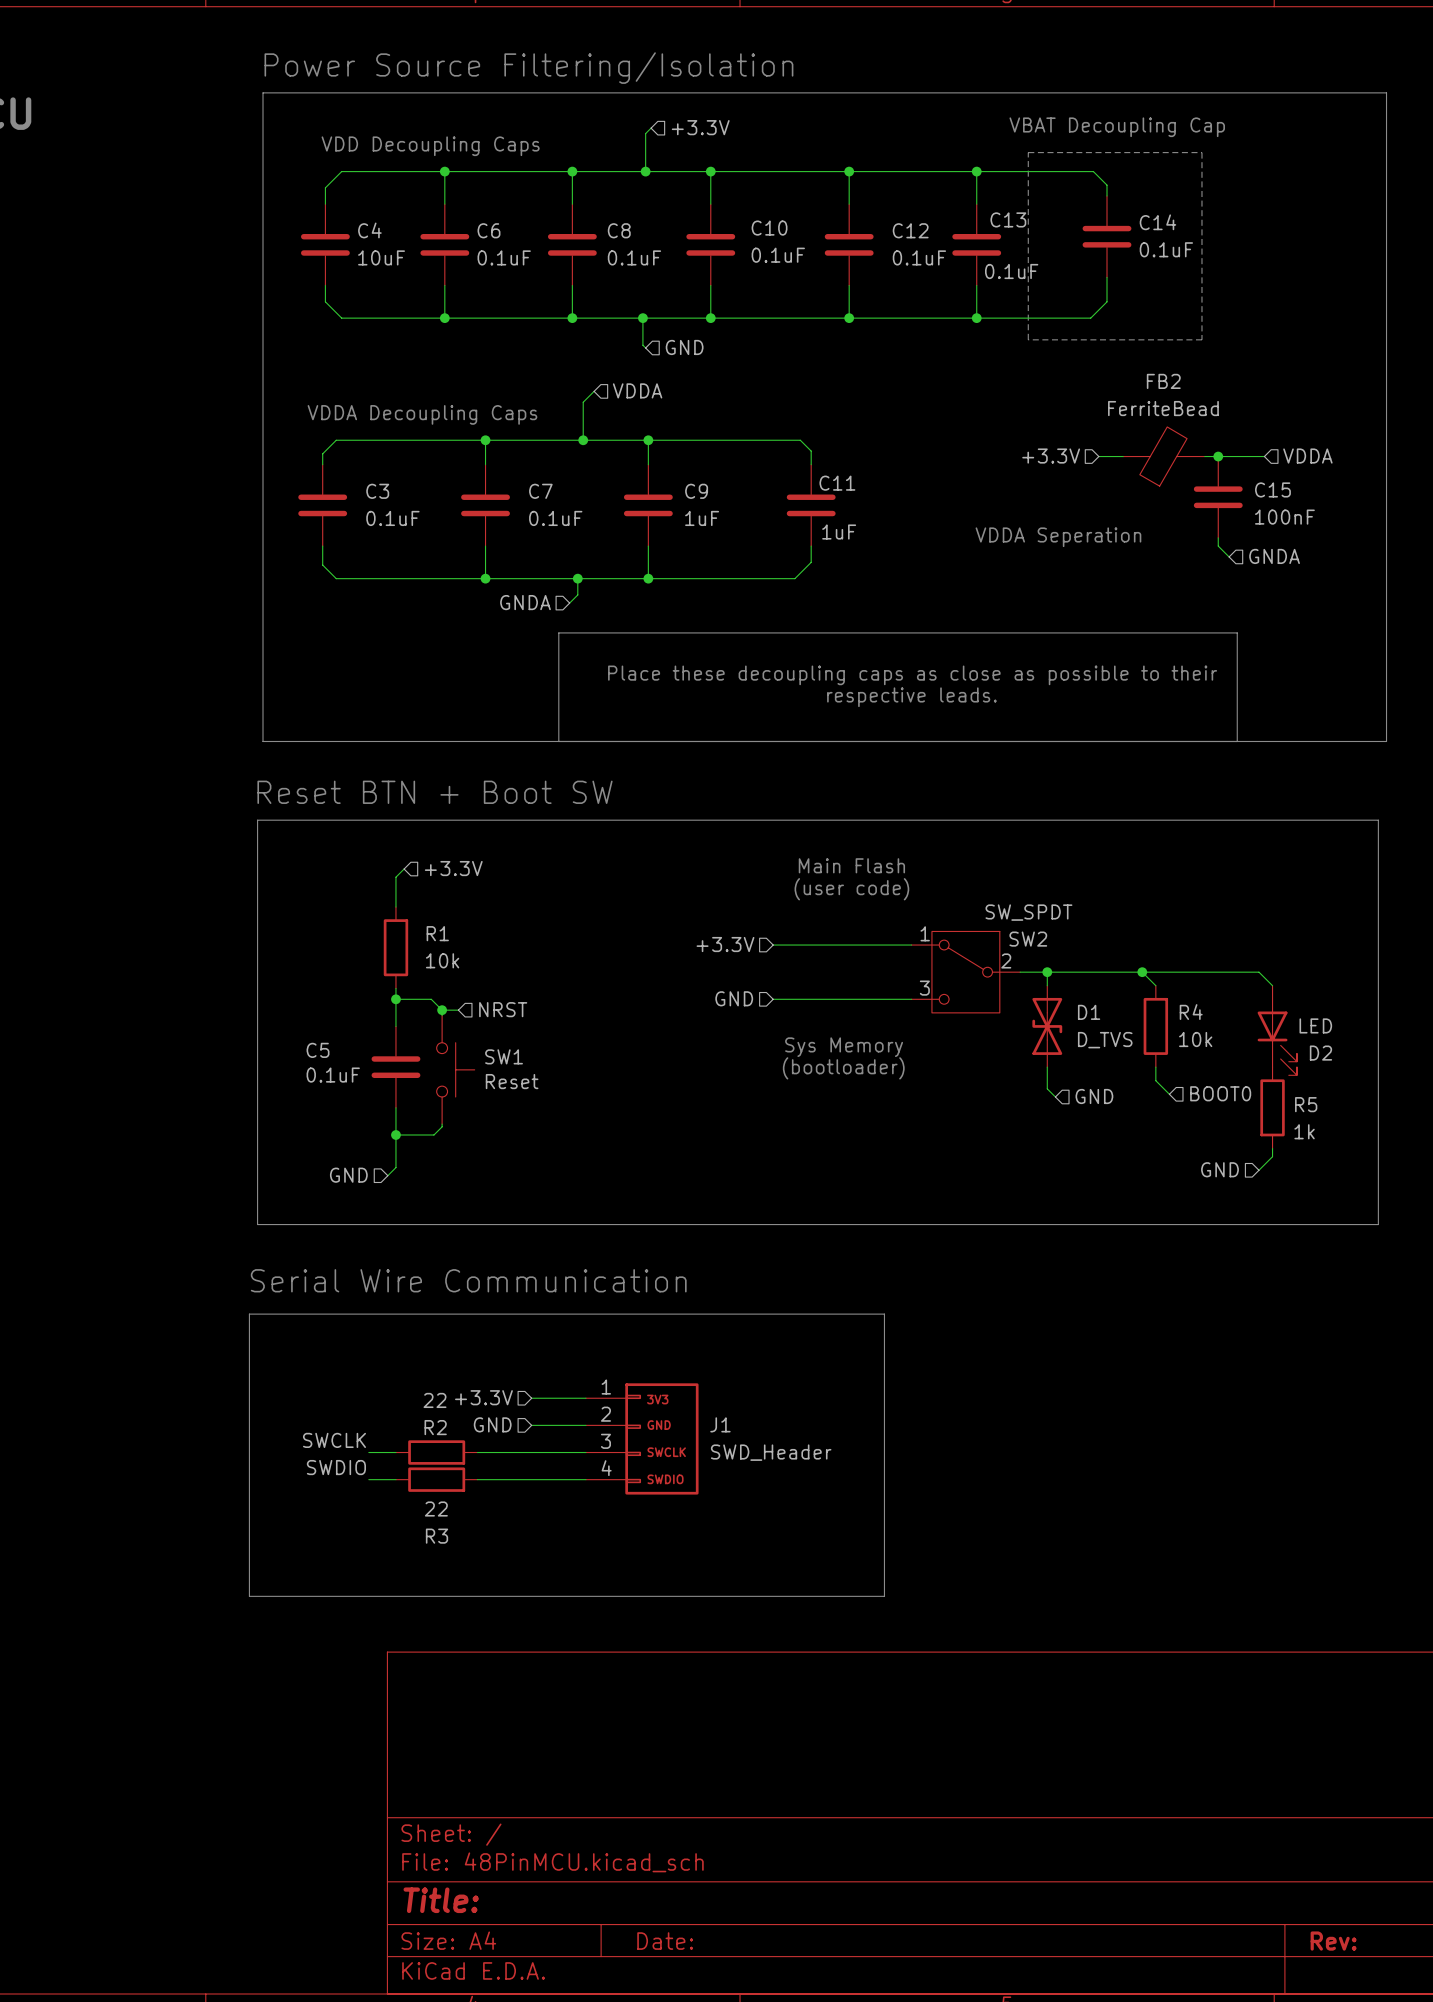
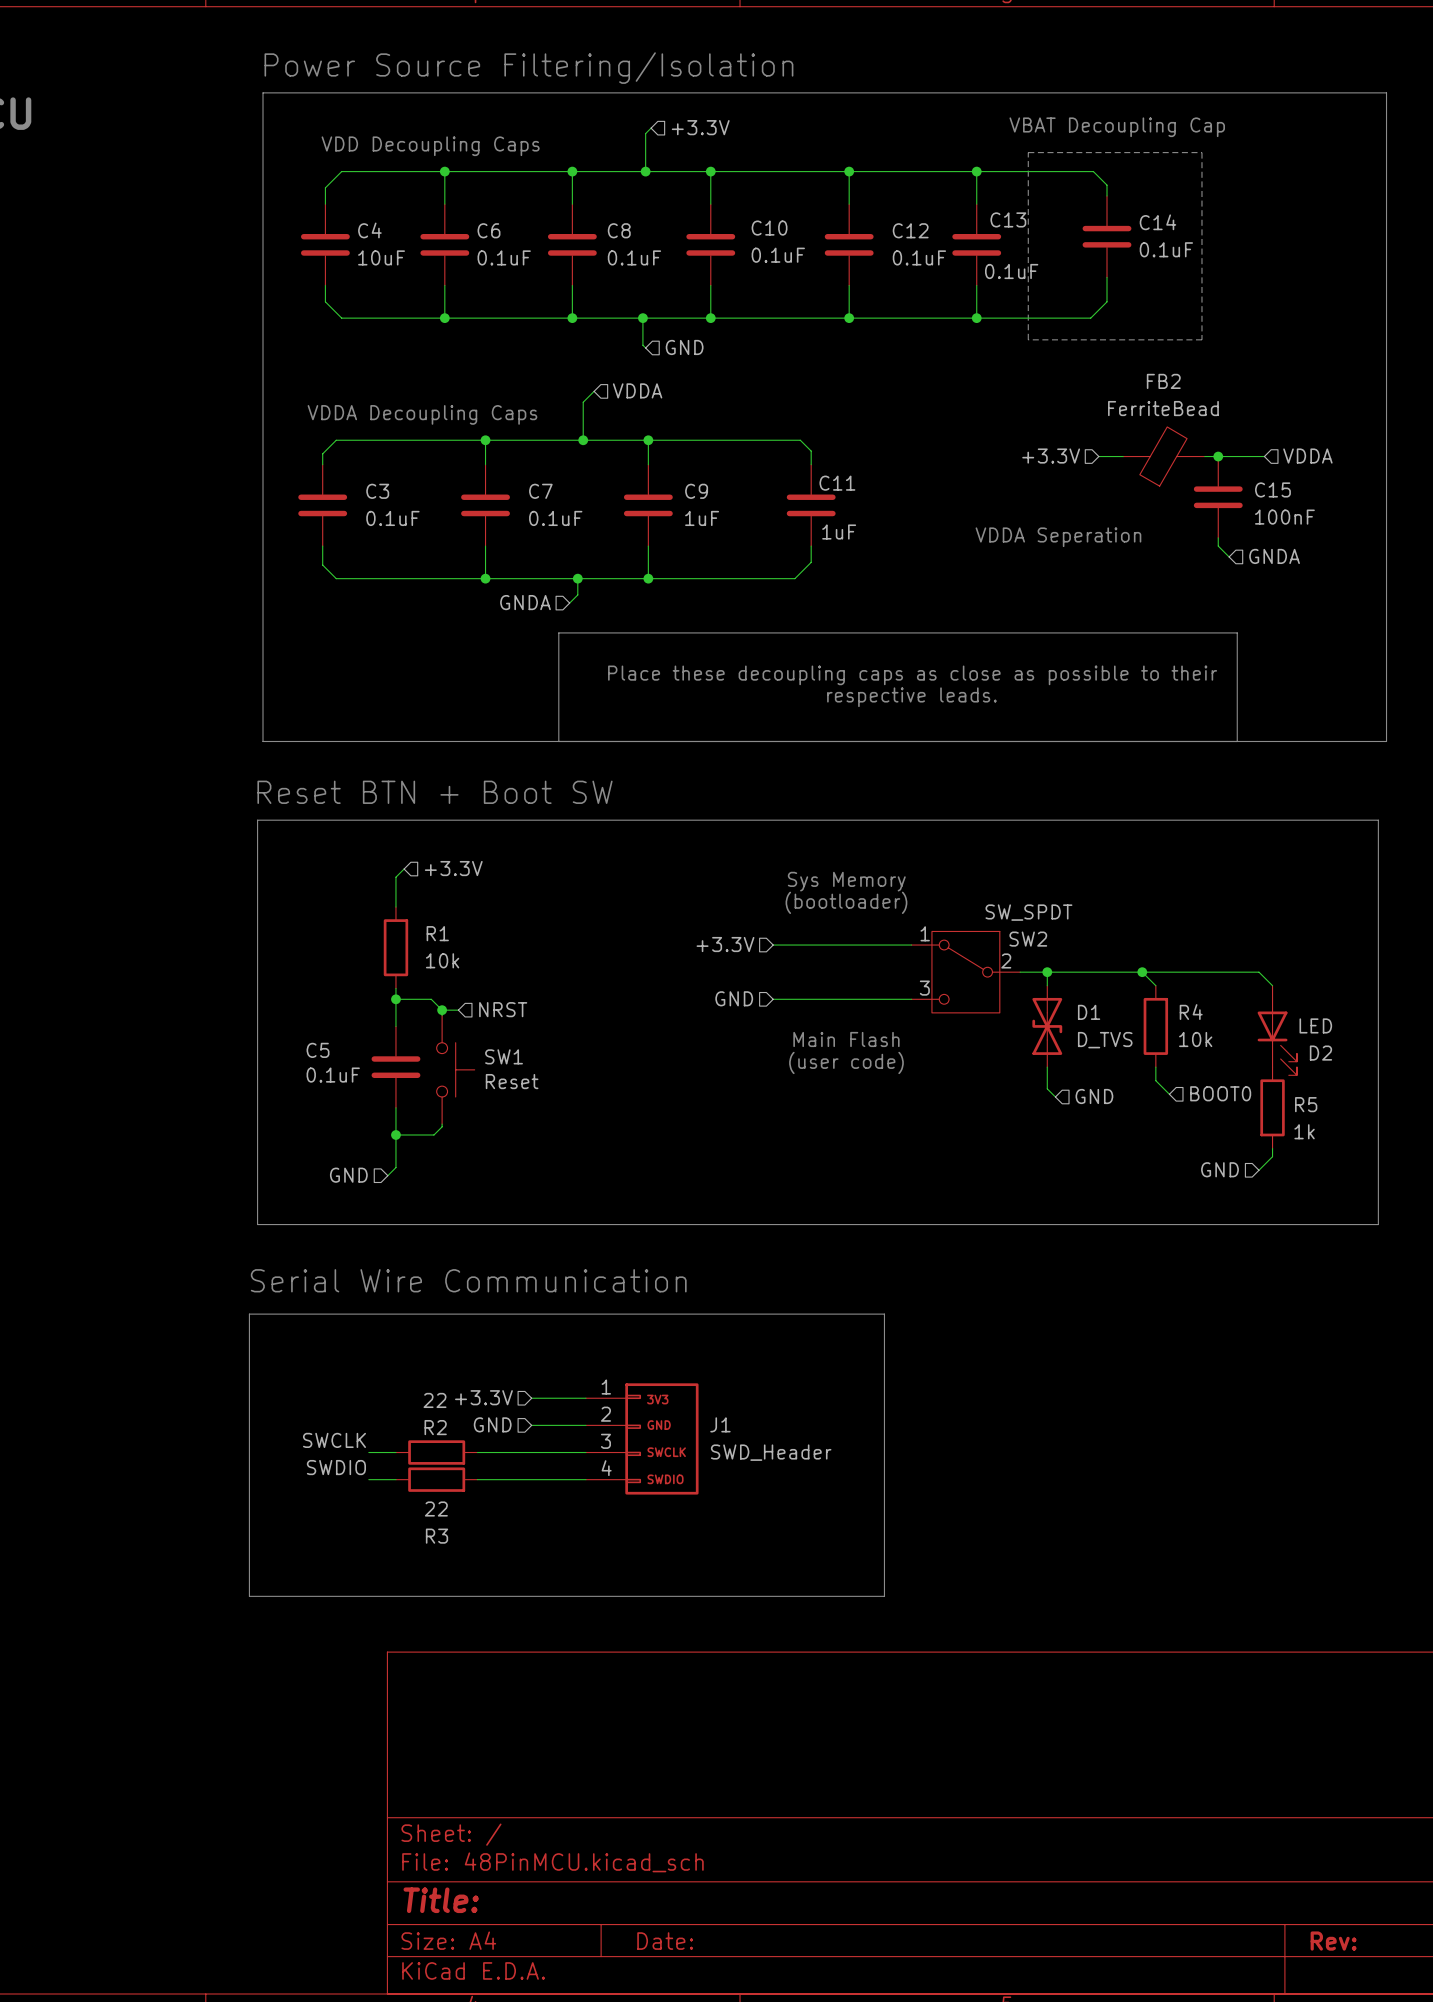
text position: Main Flash (851, 865) -> Main Flash (846, 1039)
text position: (user code) (851, 889) -> (user code) (846, 1062)
text position: Sys Memory (844, 1047) -> Sys Memory (846, 881)
text position: (bootloader) (843, 1068) -> (bootloader) (846, 902)

